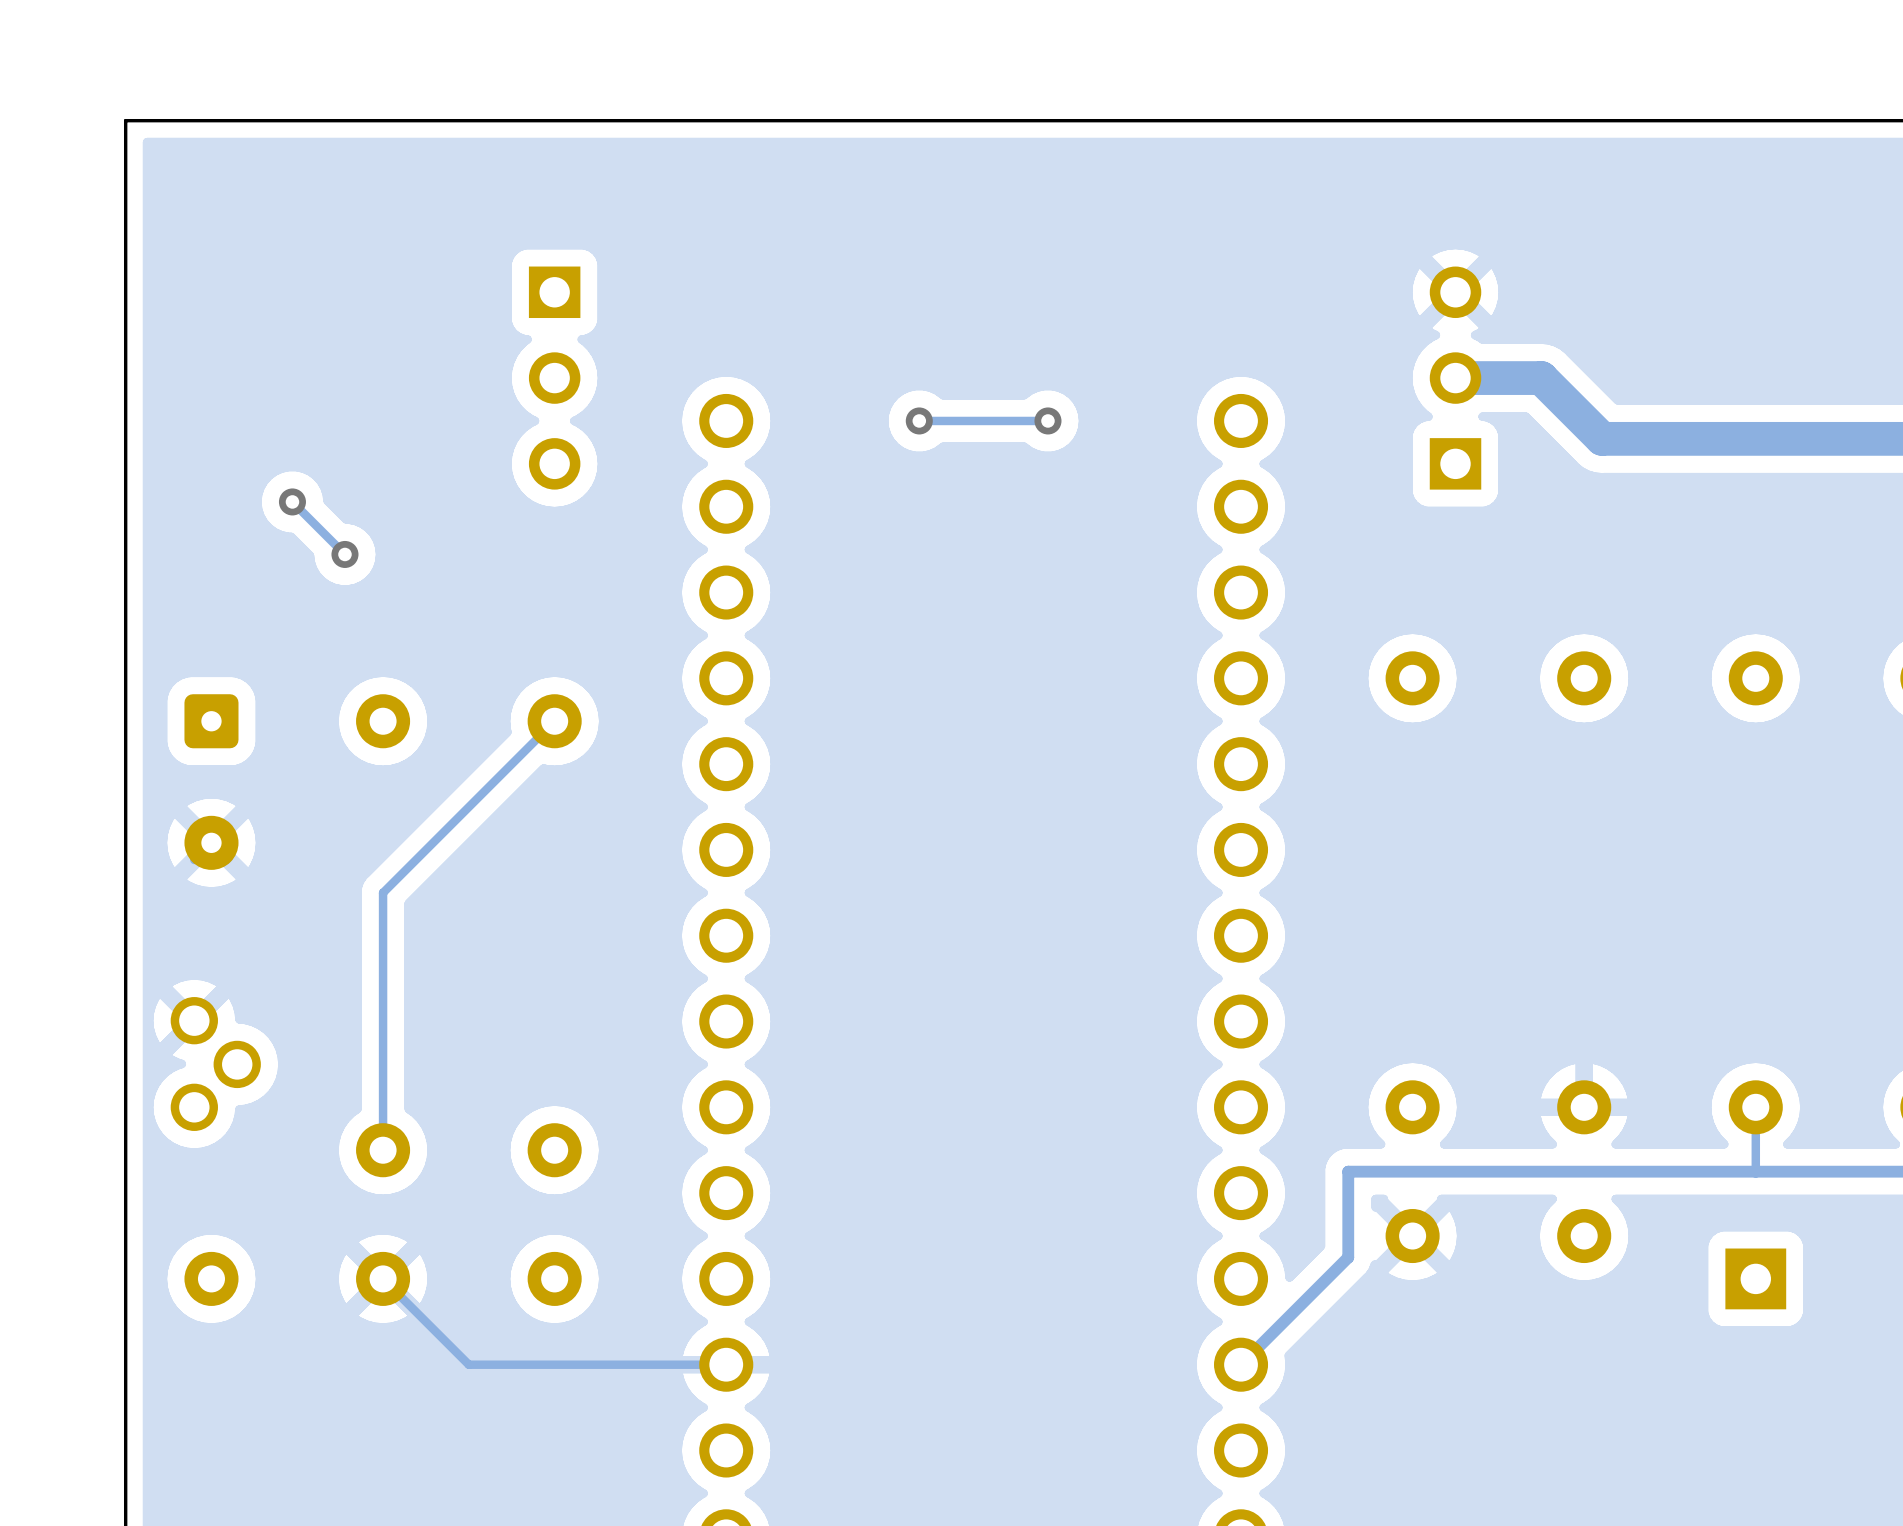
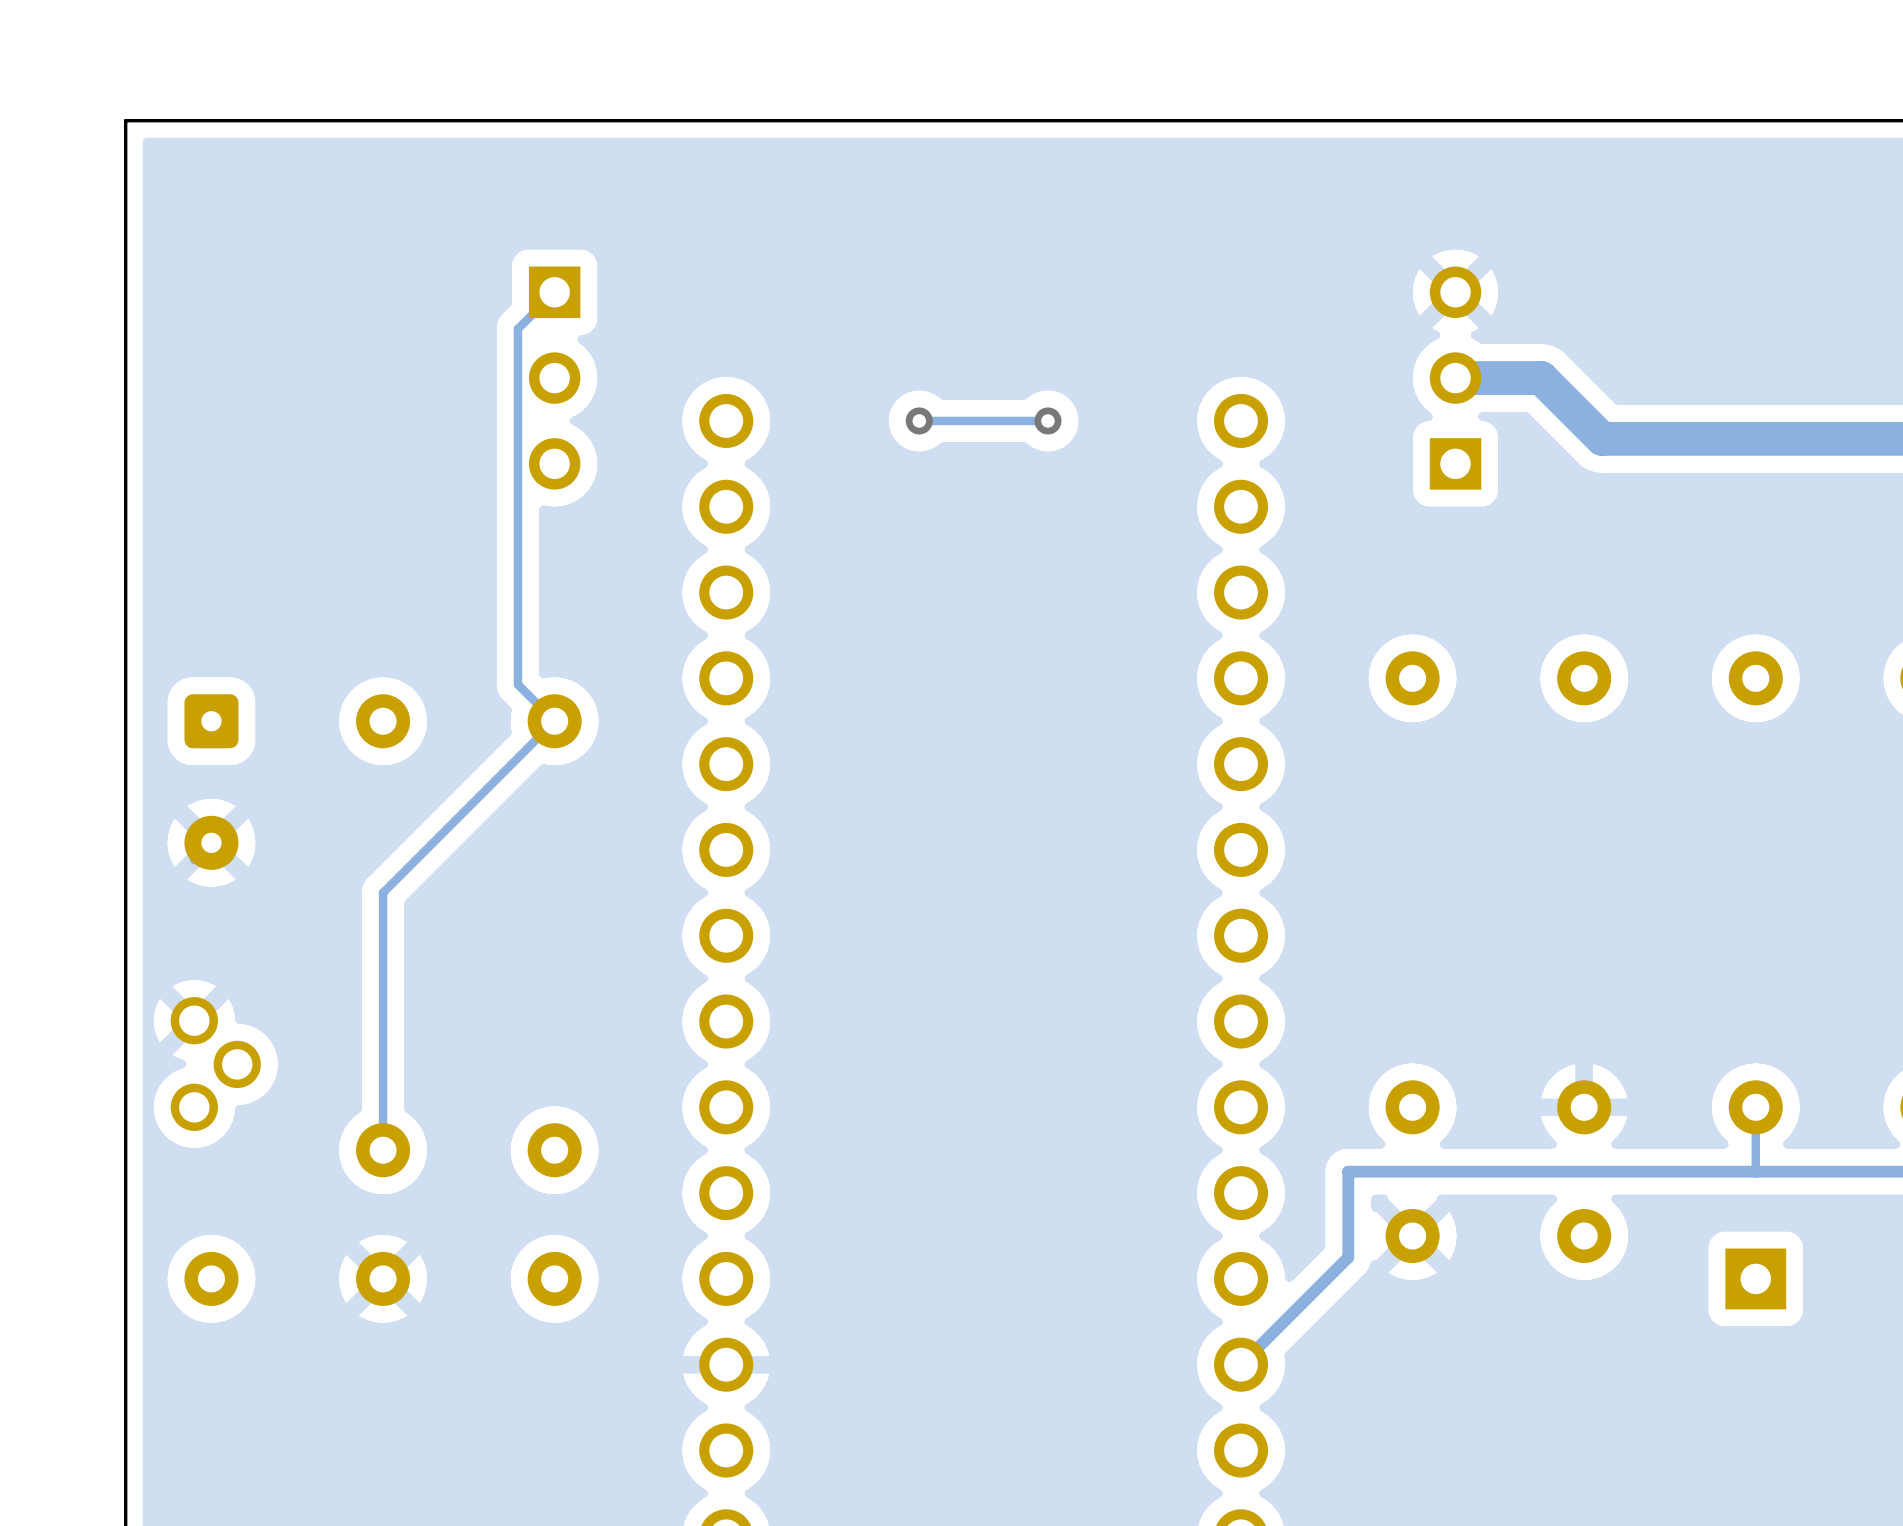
track: none -> (554, 292) (517, 328) (517, 684) (554, 721)
track: (292, 501) (344, 554) -> none
via: (292, 501) -> none
via: (344, 554) -> none
track: (383, 1278) (468, 1364) (726, 1364) -> none

